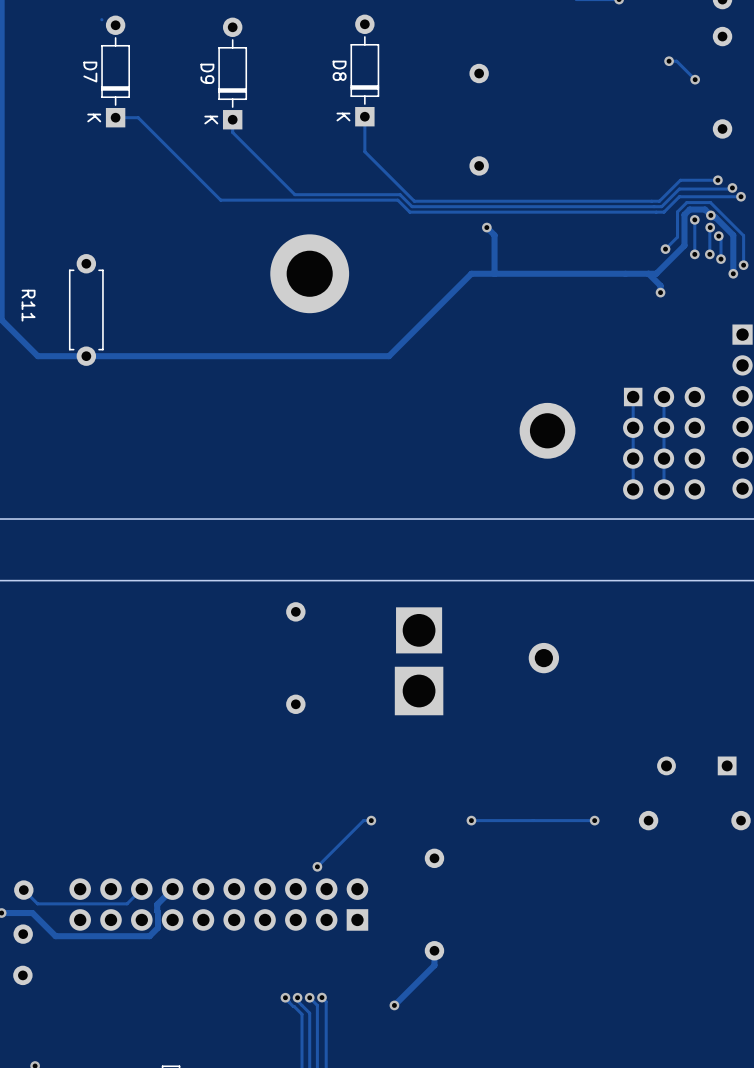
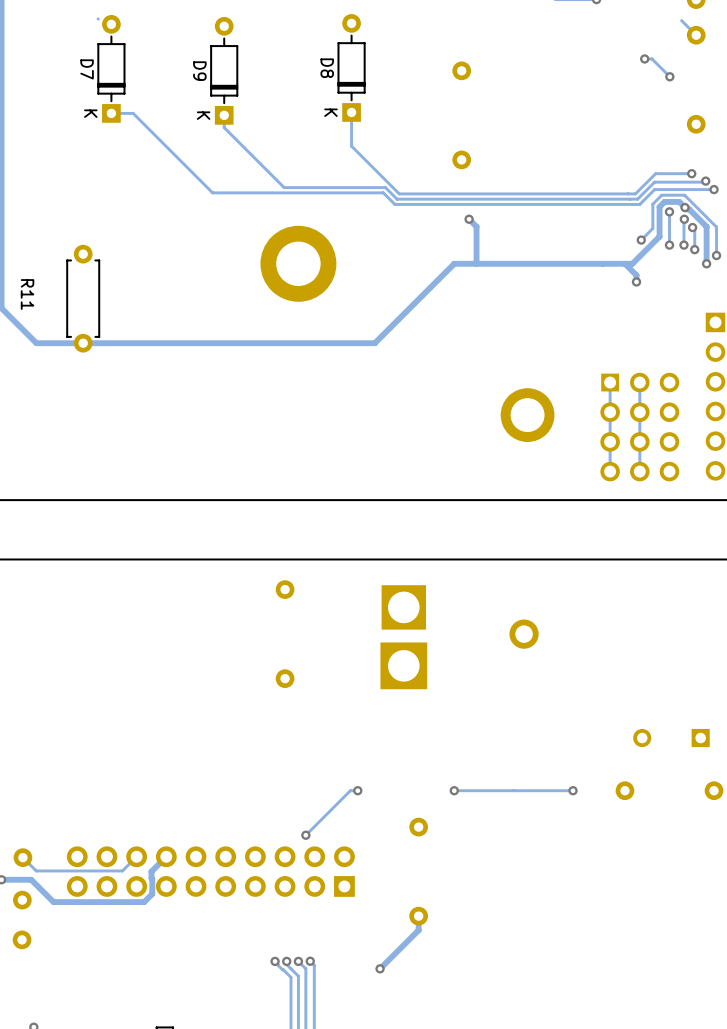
track: none -> (681, 20) (696, 35)

